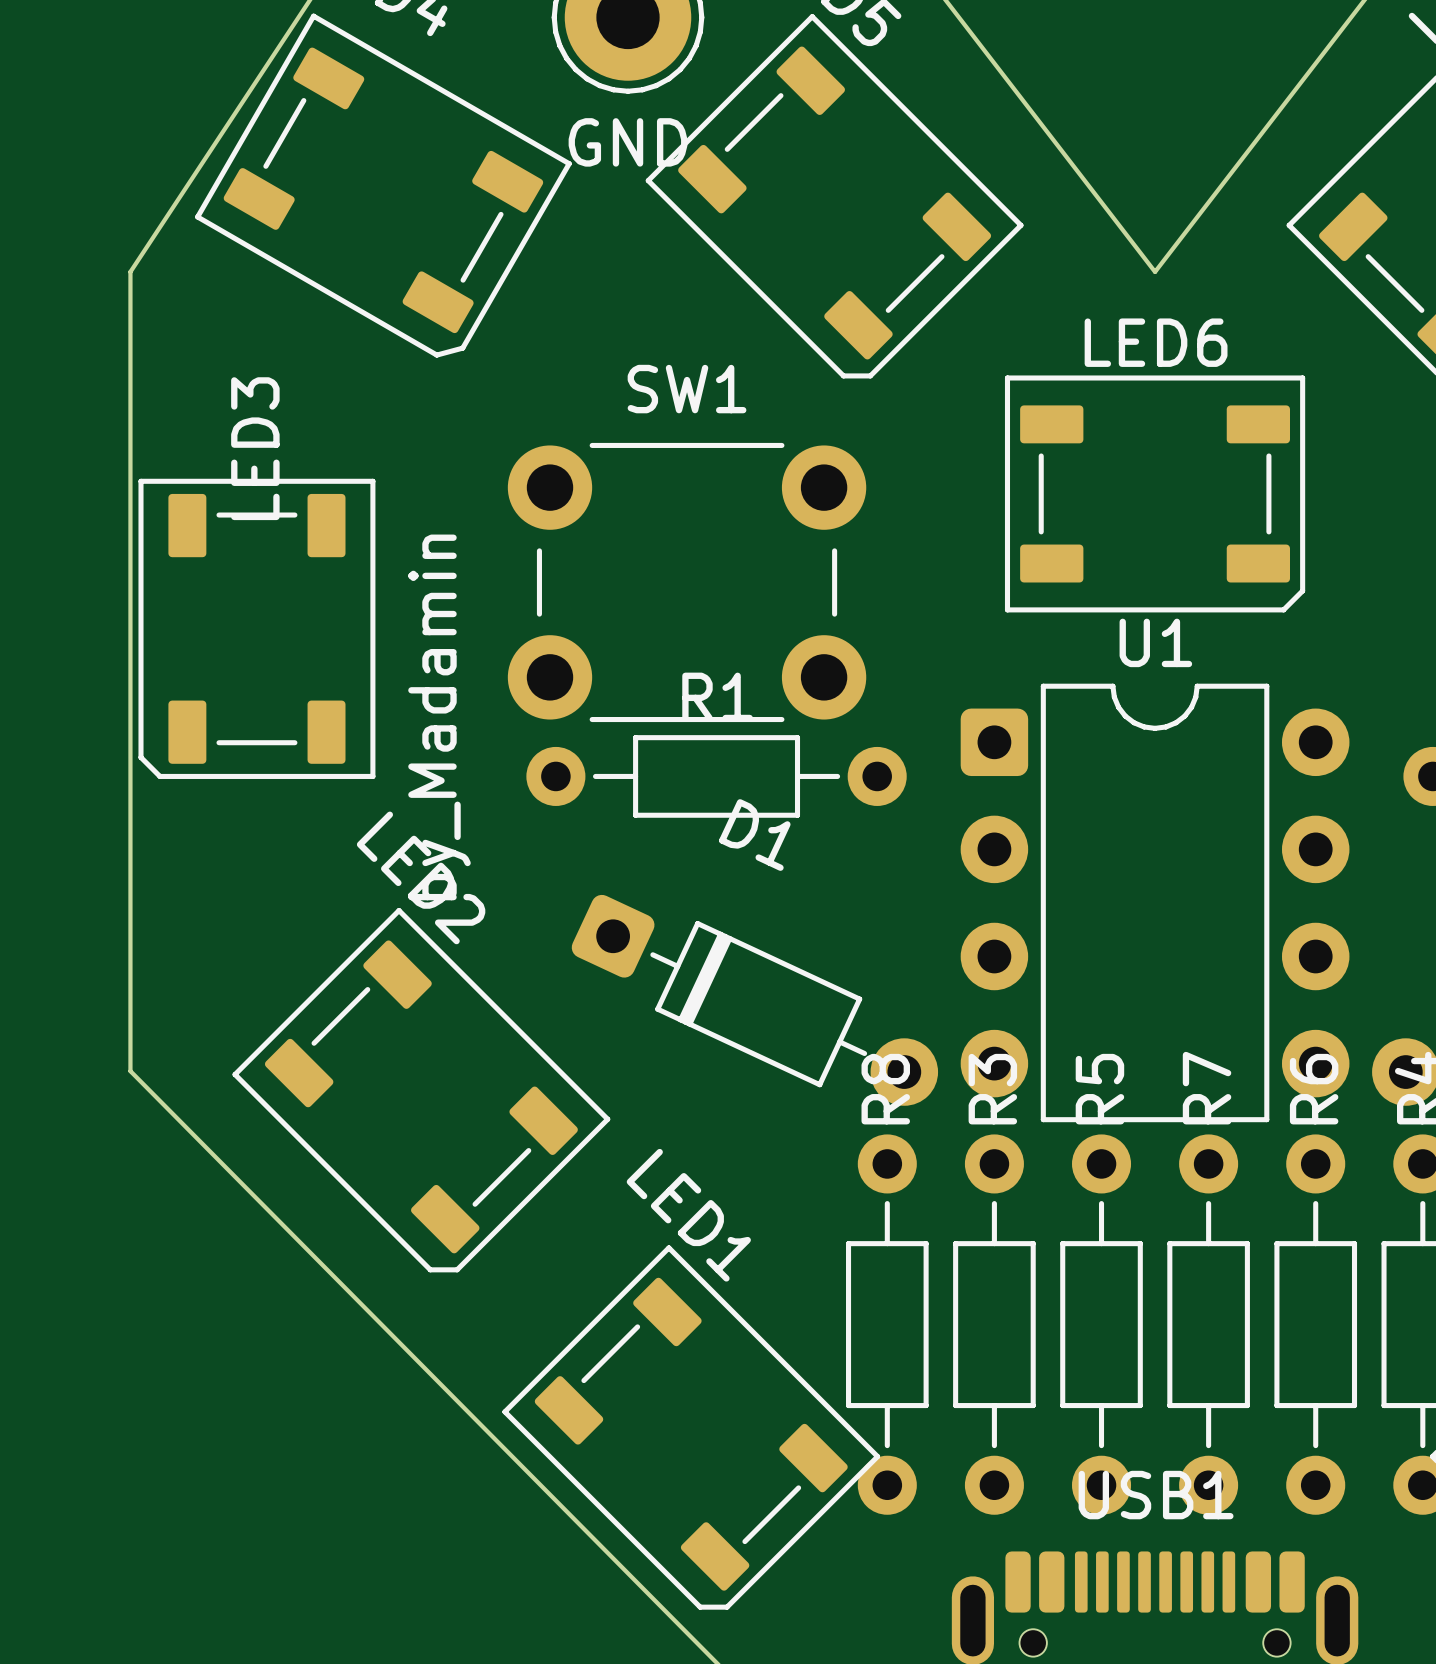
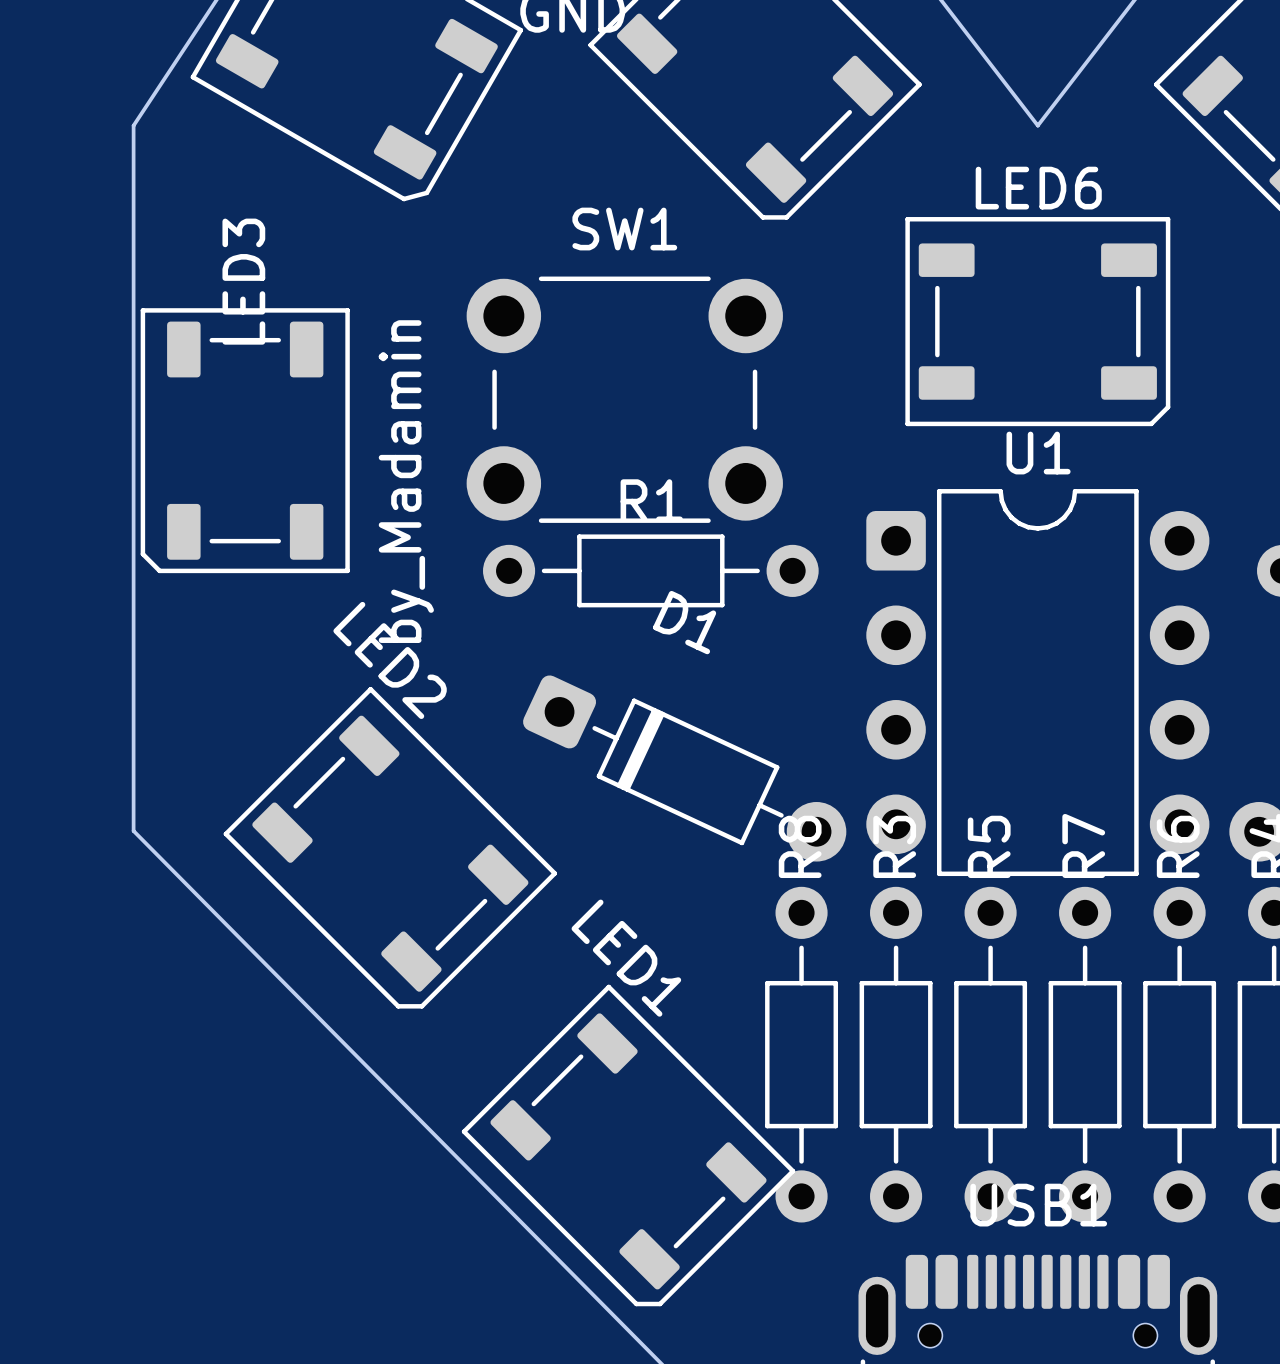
text position: by_Madamin (439, 717) -> by_Madamin (406, 481)

